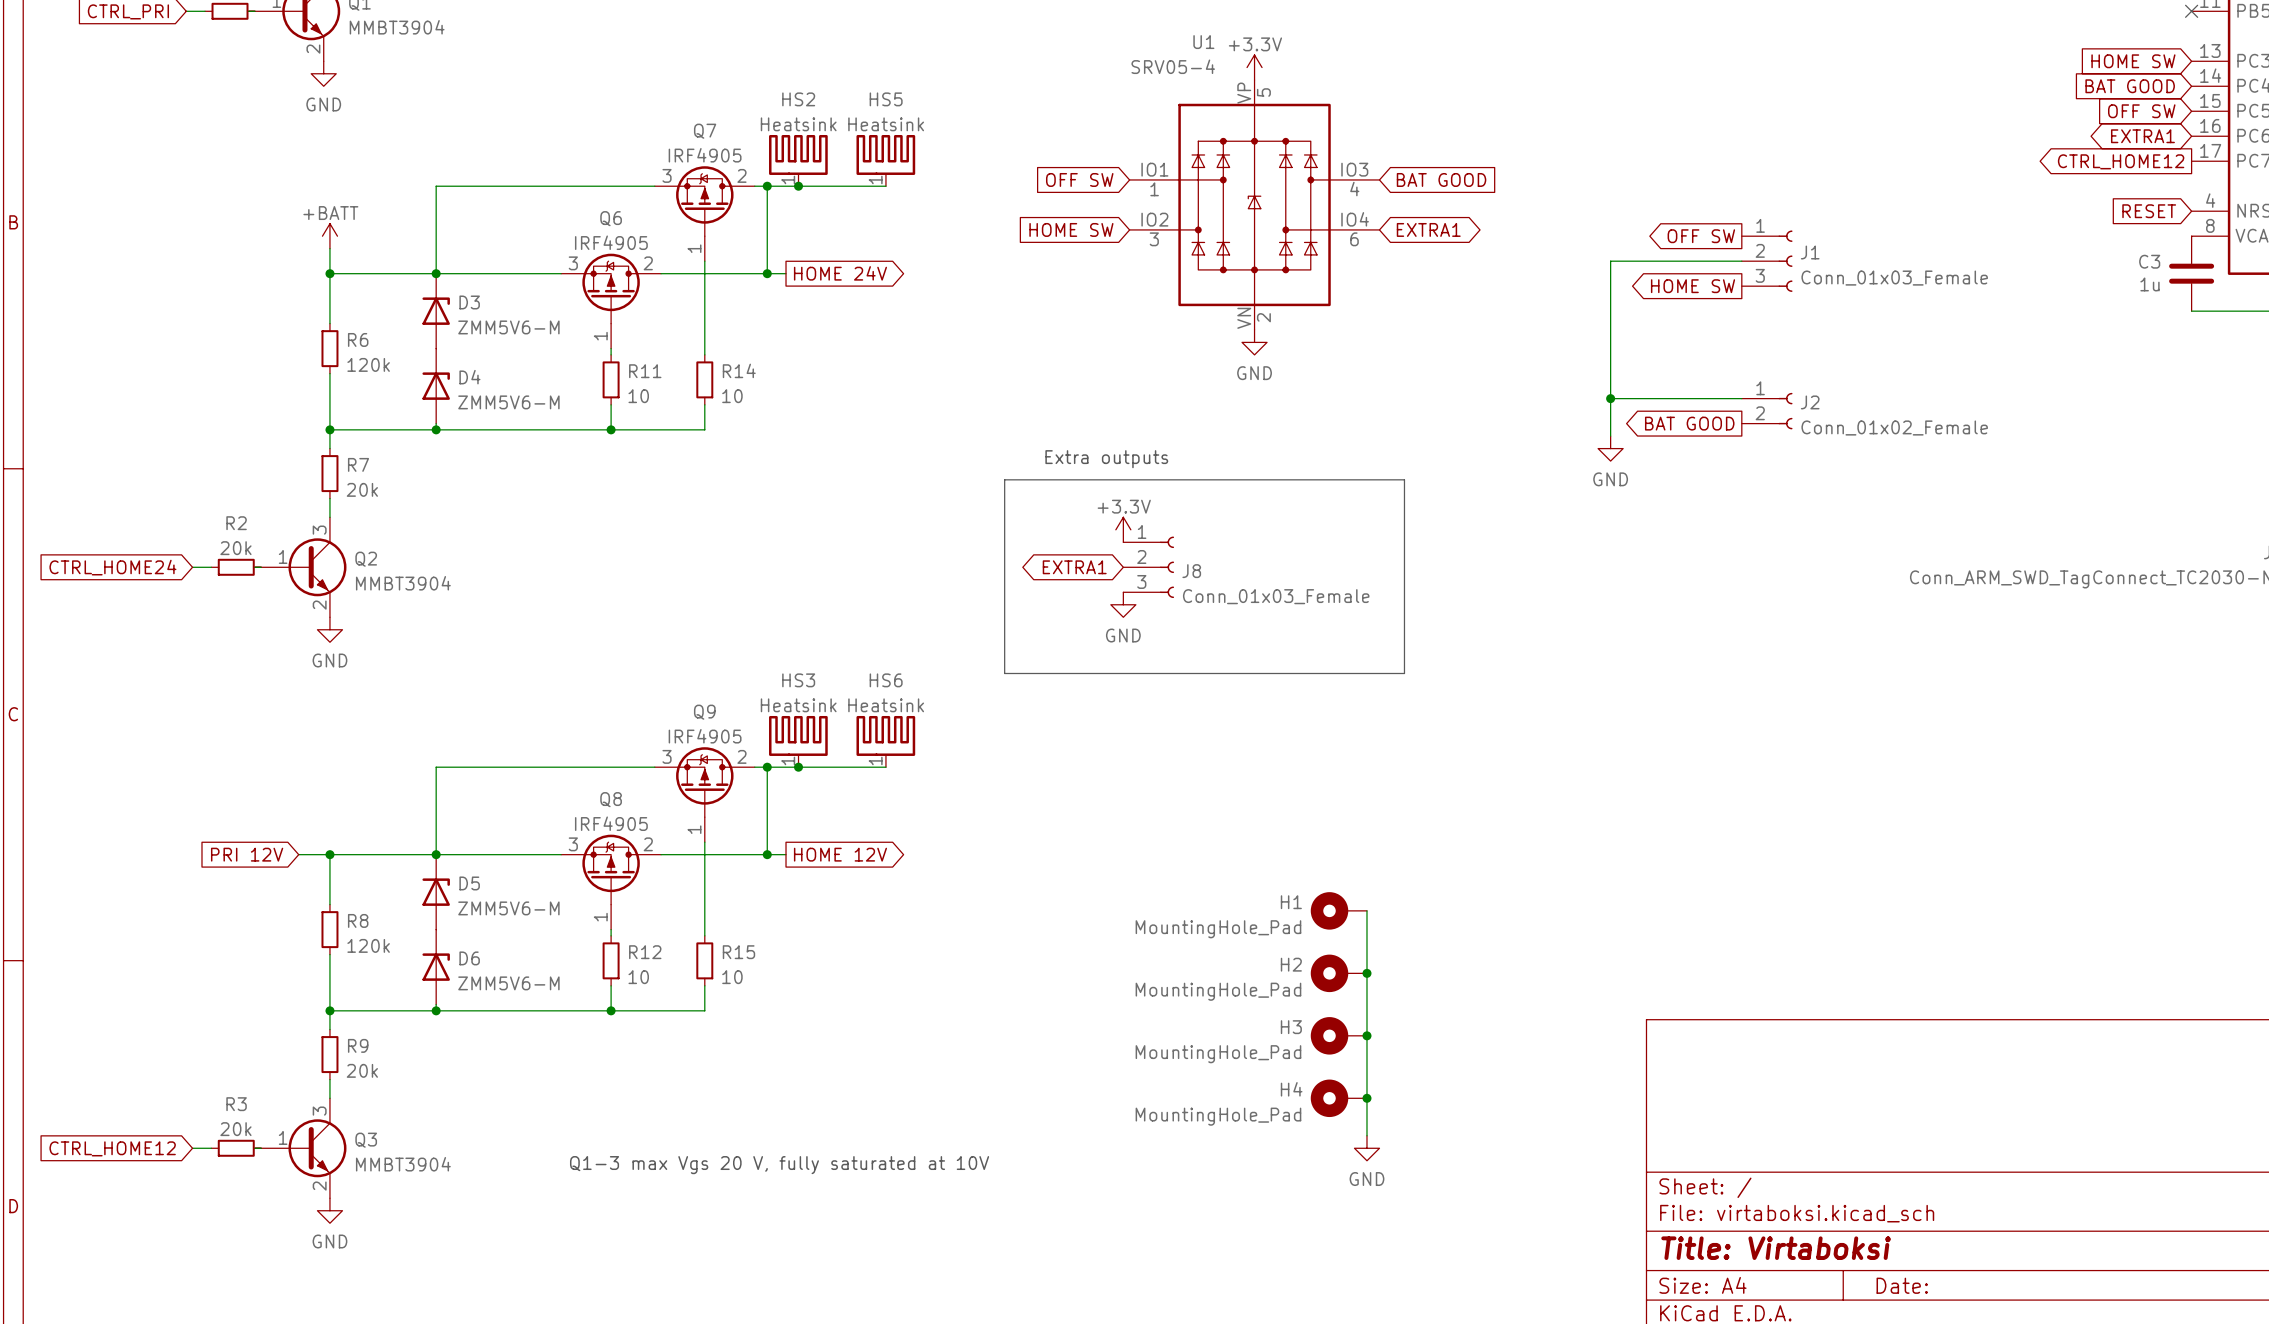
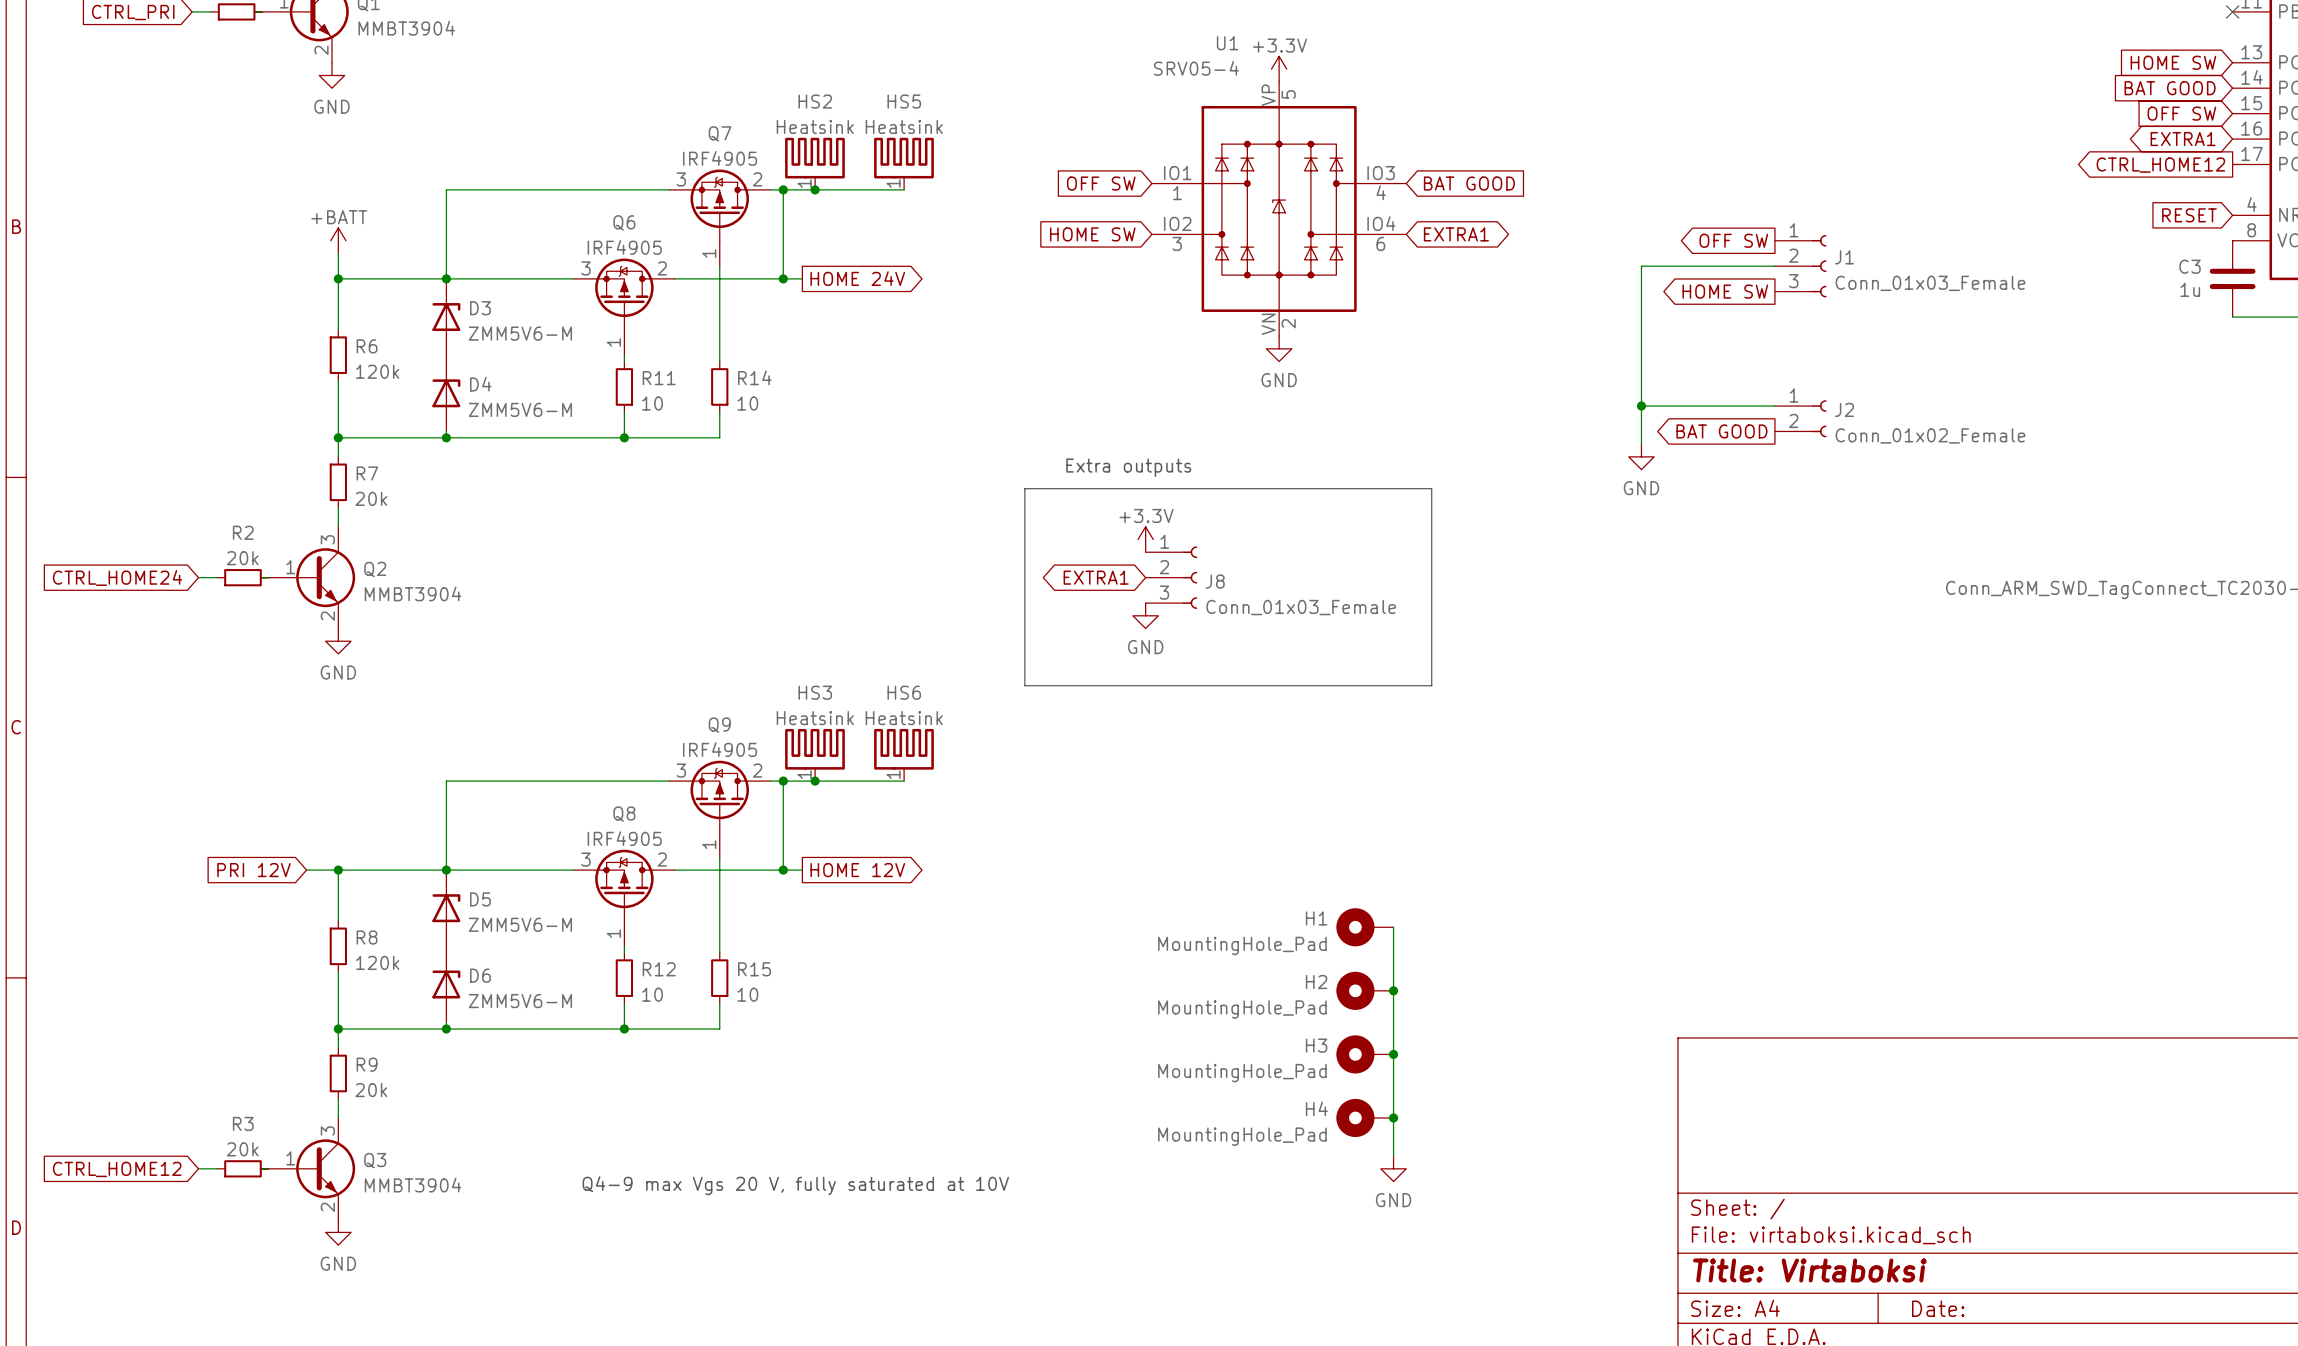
text: Q1-3 max Vgs 20 V, fully saturated at 10V (779, 1165) -> Q4-9 max Vgs 20 V, fully saturated at 10V (795, 1185)

